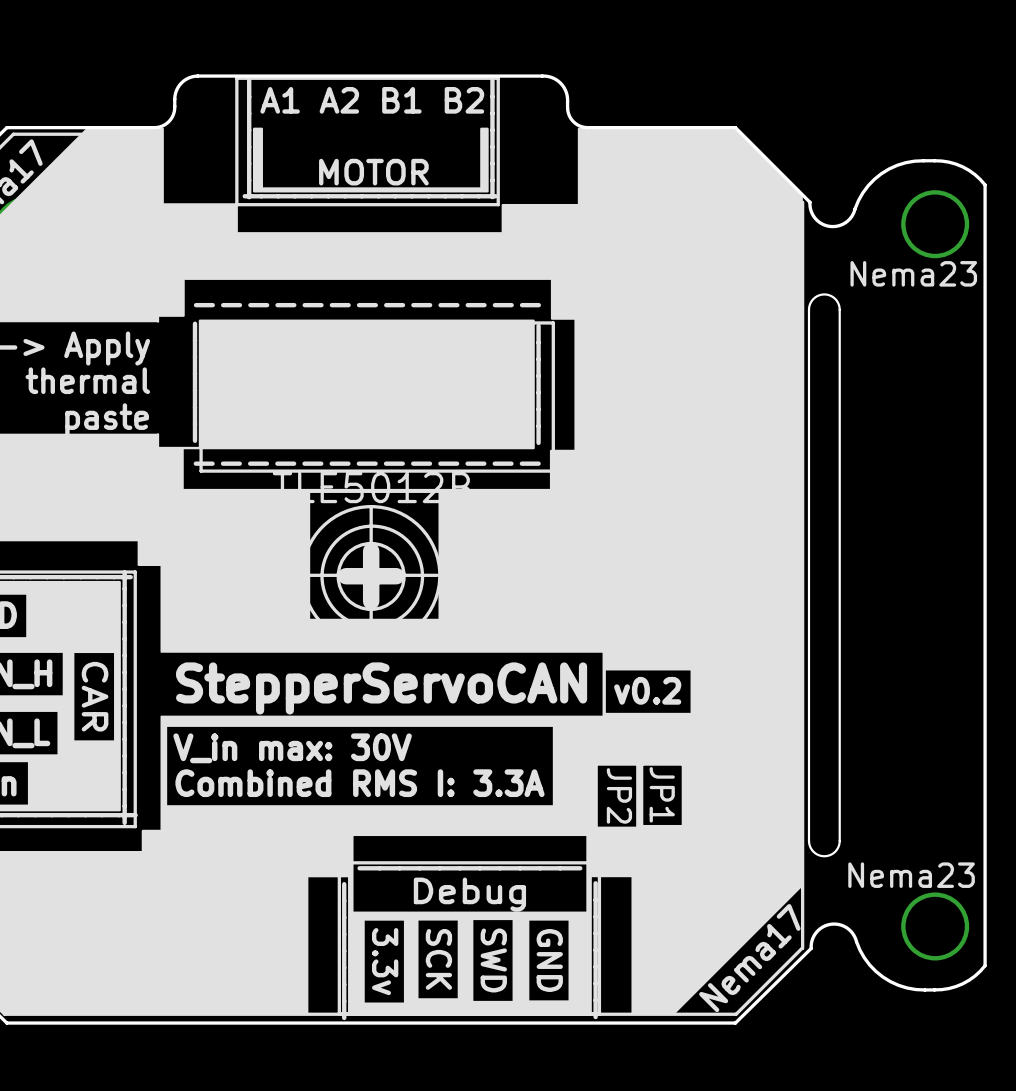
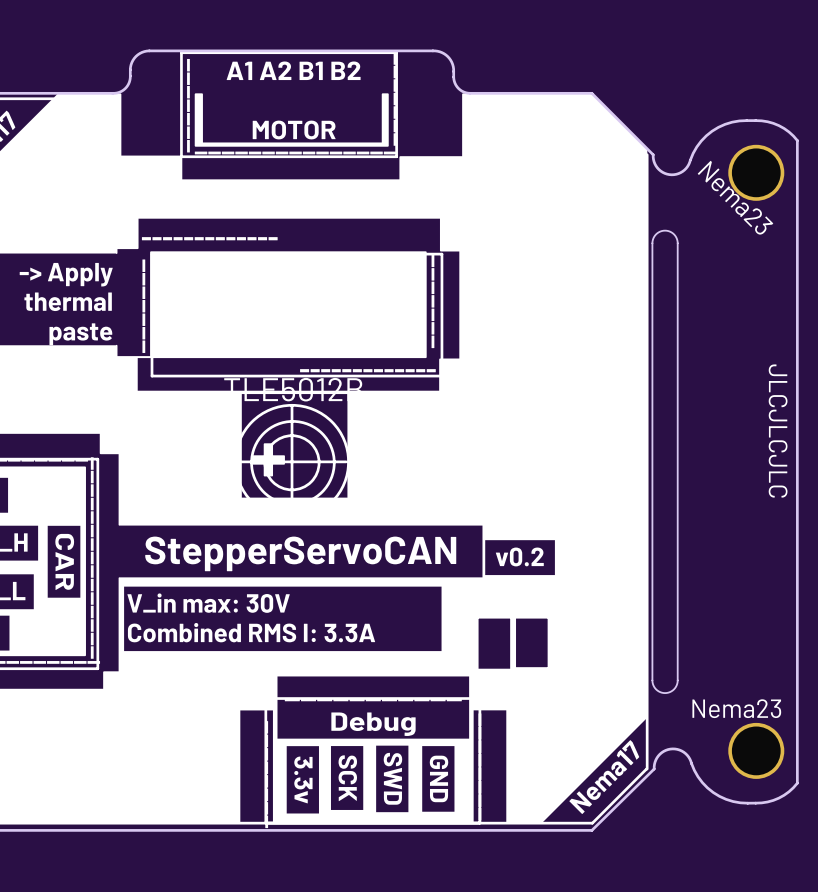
text rotation: 0° (913, 273) -> 45° clockwise (735, 197)
text: none -> JLCJLCJLC (778, 431)
JP1: (662, 794) -> none
JP2: (619, 795) -> none

